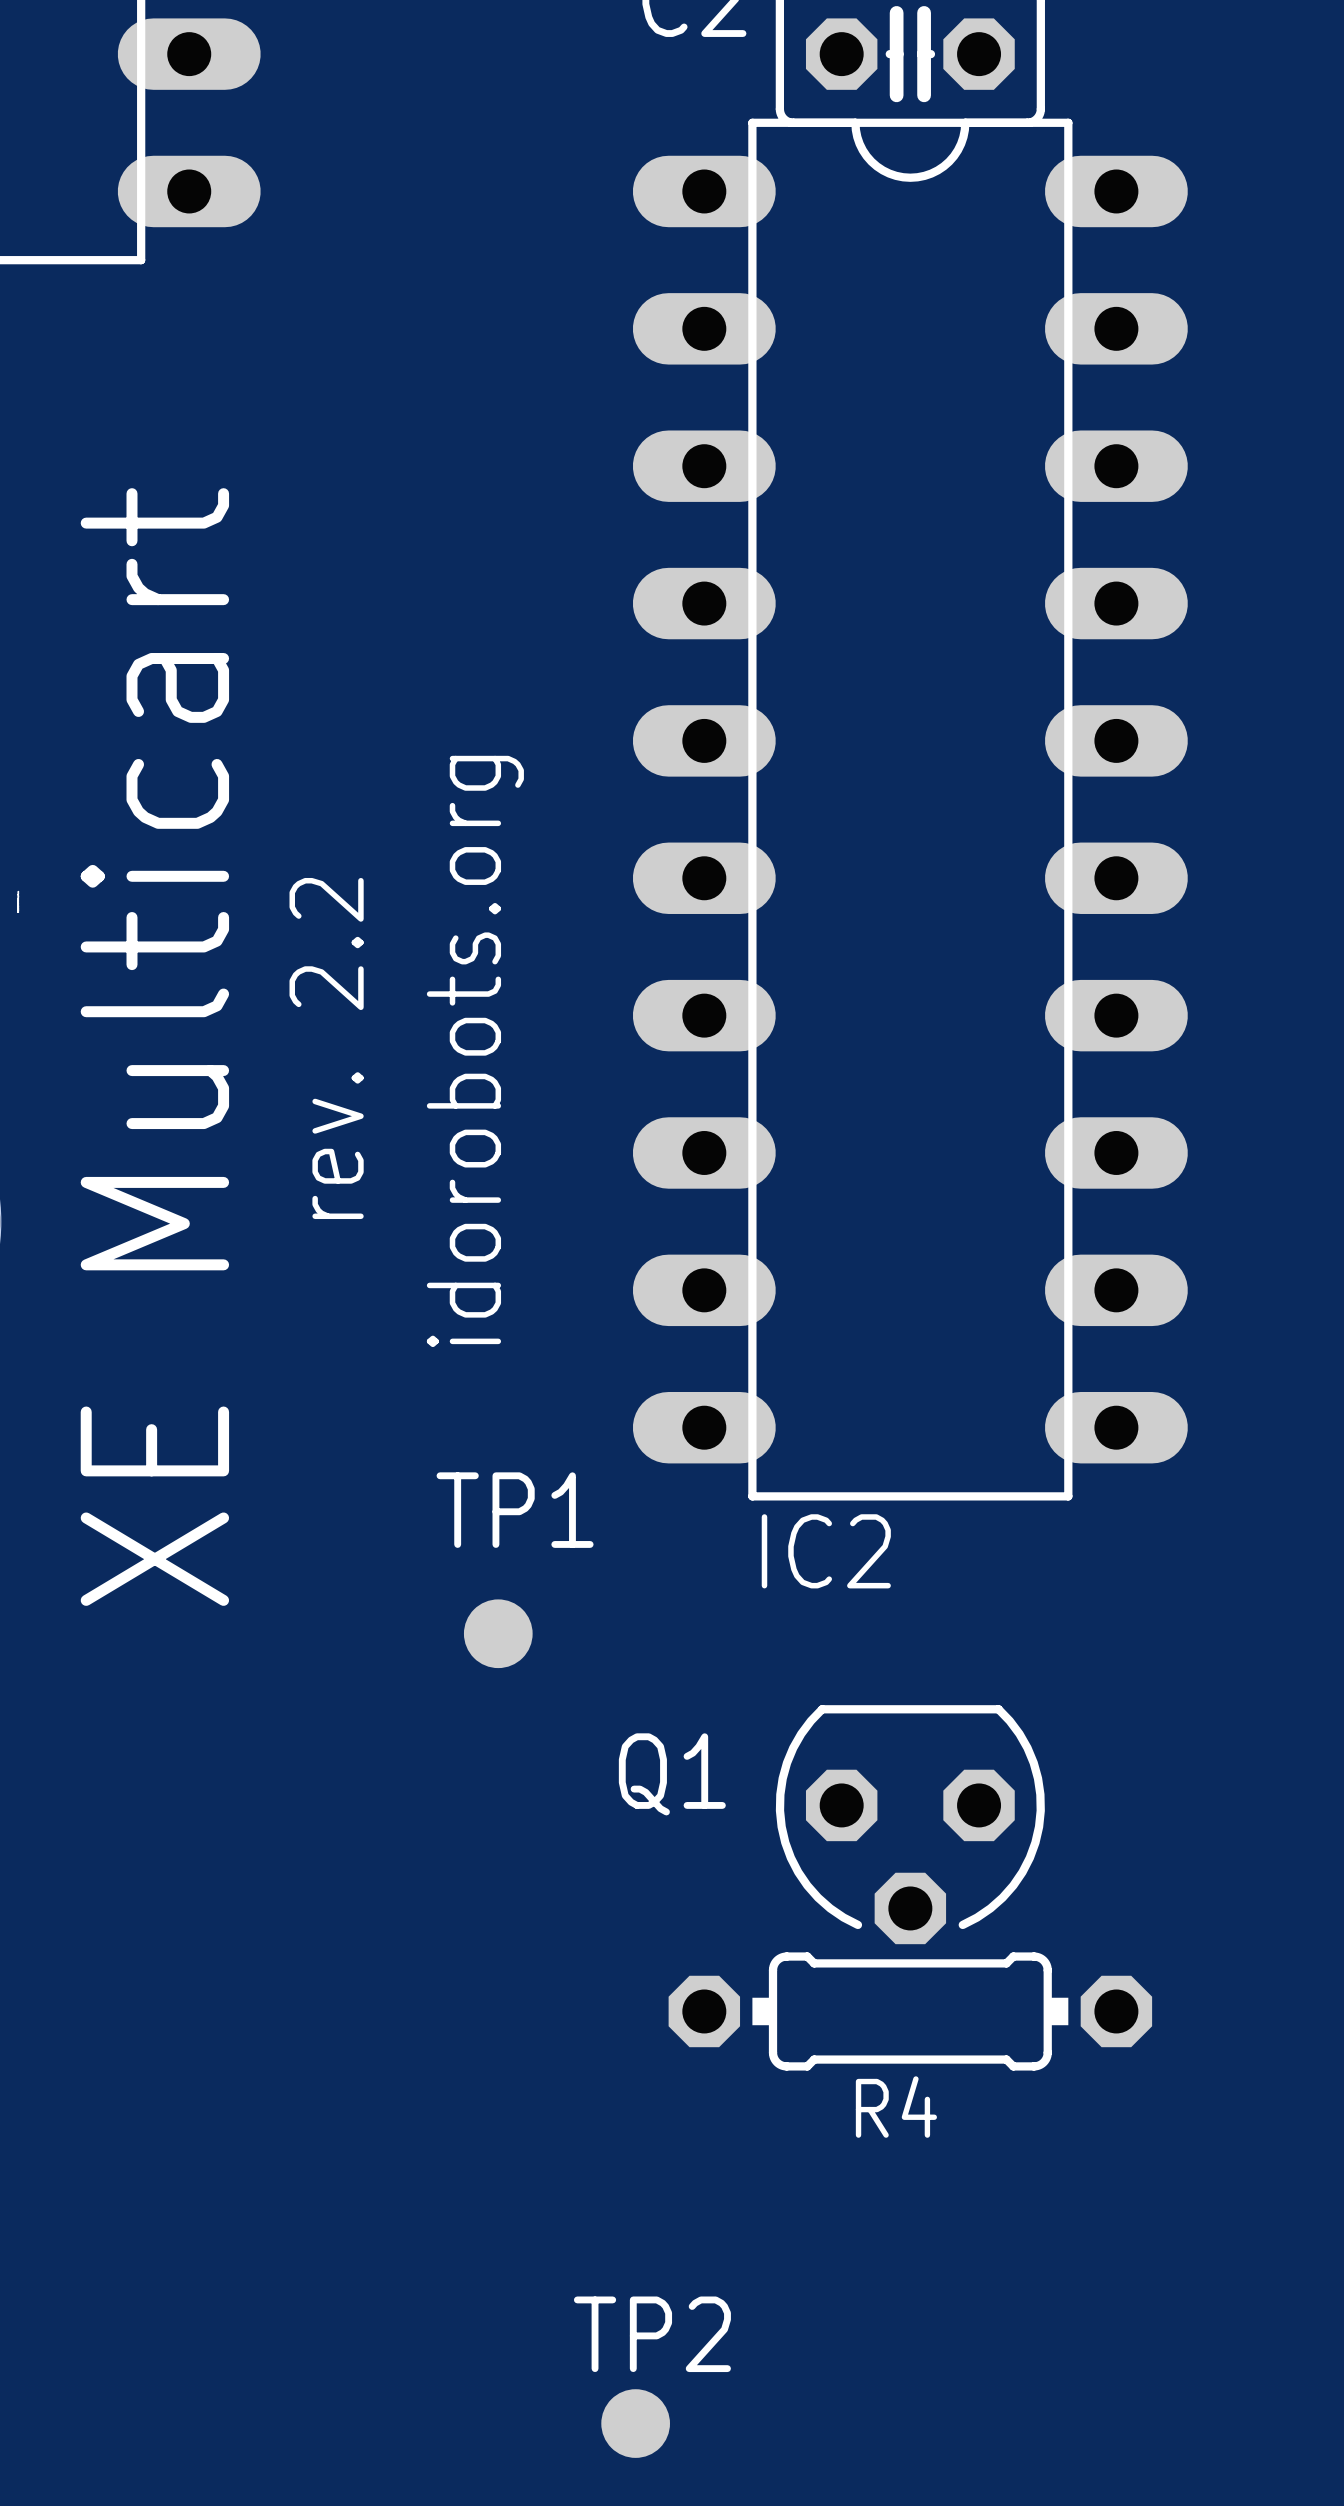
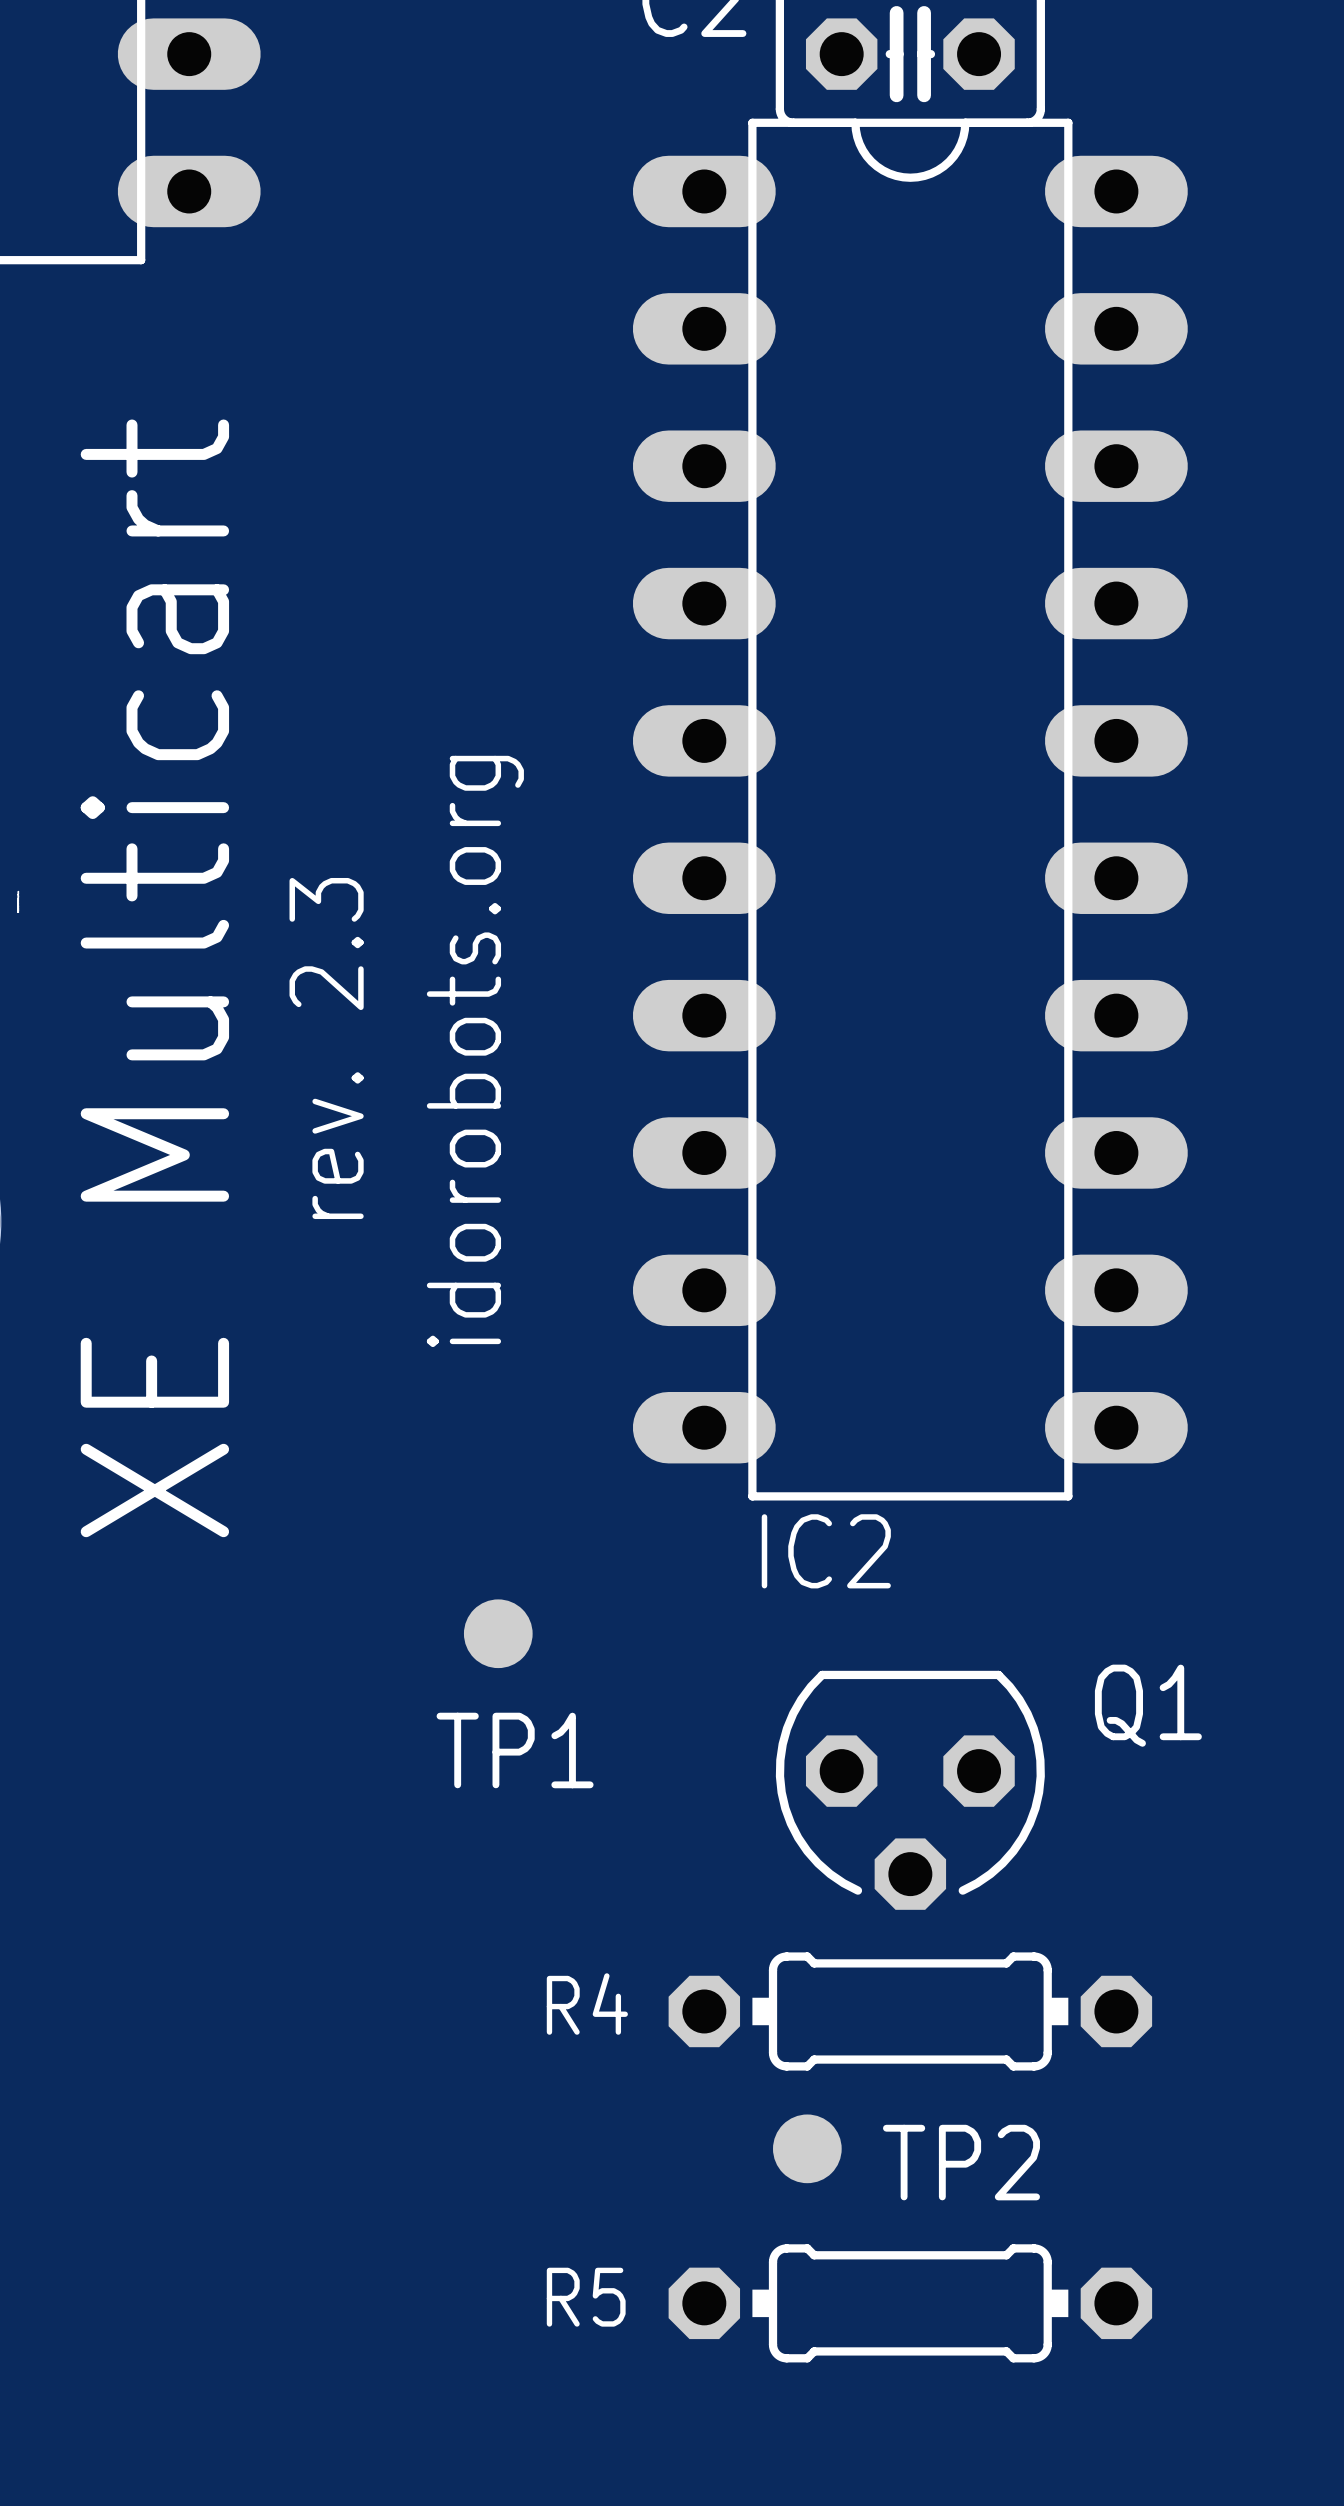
text position: XE Multicart (154, 1047) -> XE Multicart (154, 978)
text: rev. 2.2 (326, 1048) -> rev. 2.3 (326, 1048)
TP1 name position: TP1 (515, 1510) -> TP1 (515, 1750)
Q1 name position: Q1 (672, 1774) -> Q1 (1148, 1705)
Q1 position: (910, 1824) -> (910, 1790)
R4 name position: R4 (896, 2107) -> R4 (587, 2004)
R5: none -> (910, 2303)
TP2 name position: TP2 (652, 2334) -> TP2 (961, 2162)
TP2 position: (635, 2423) -> (807, 2148)

